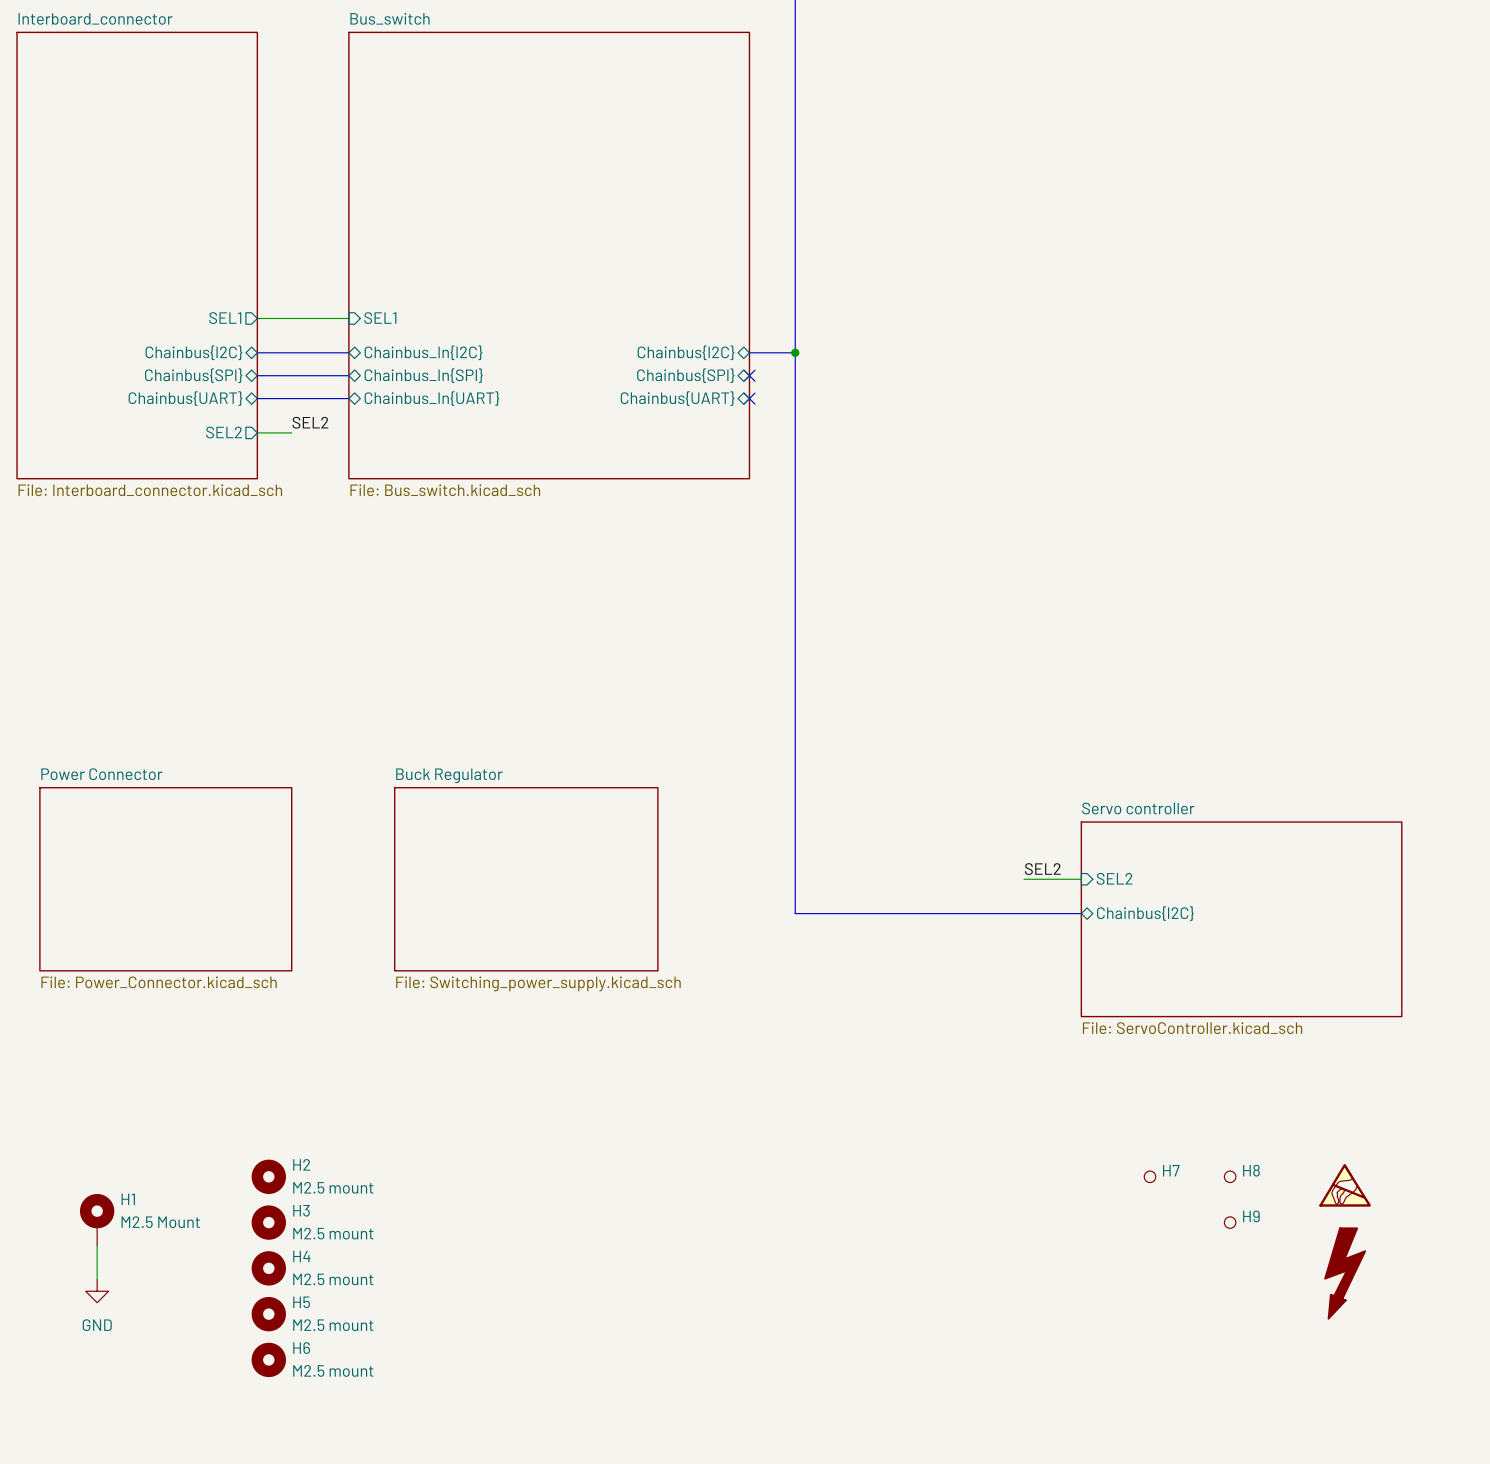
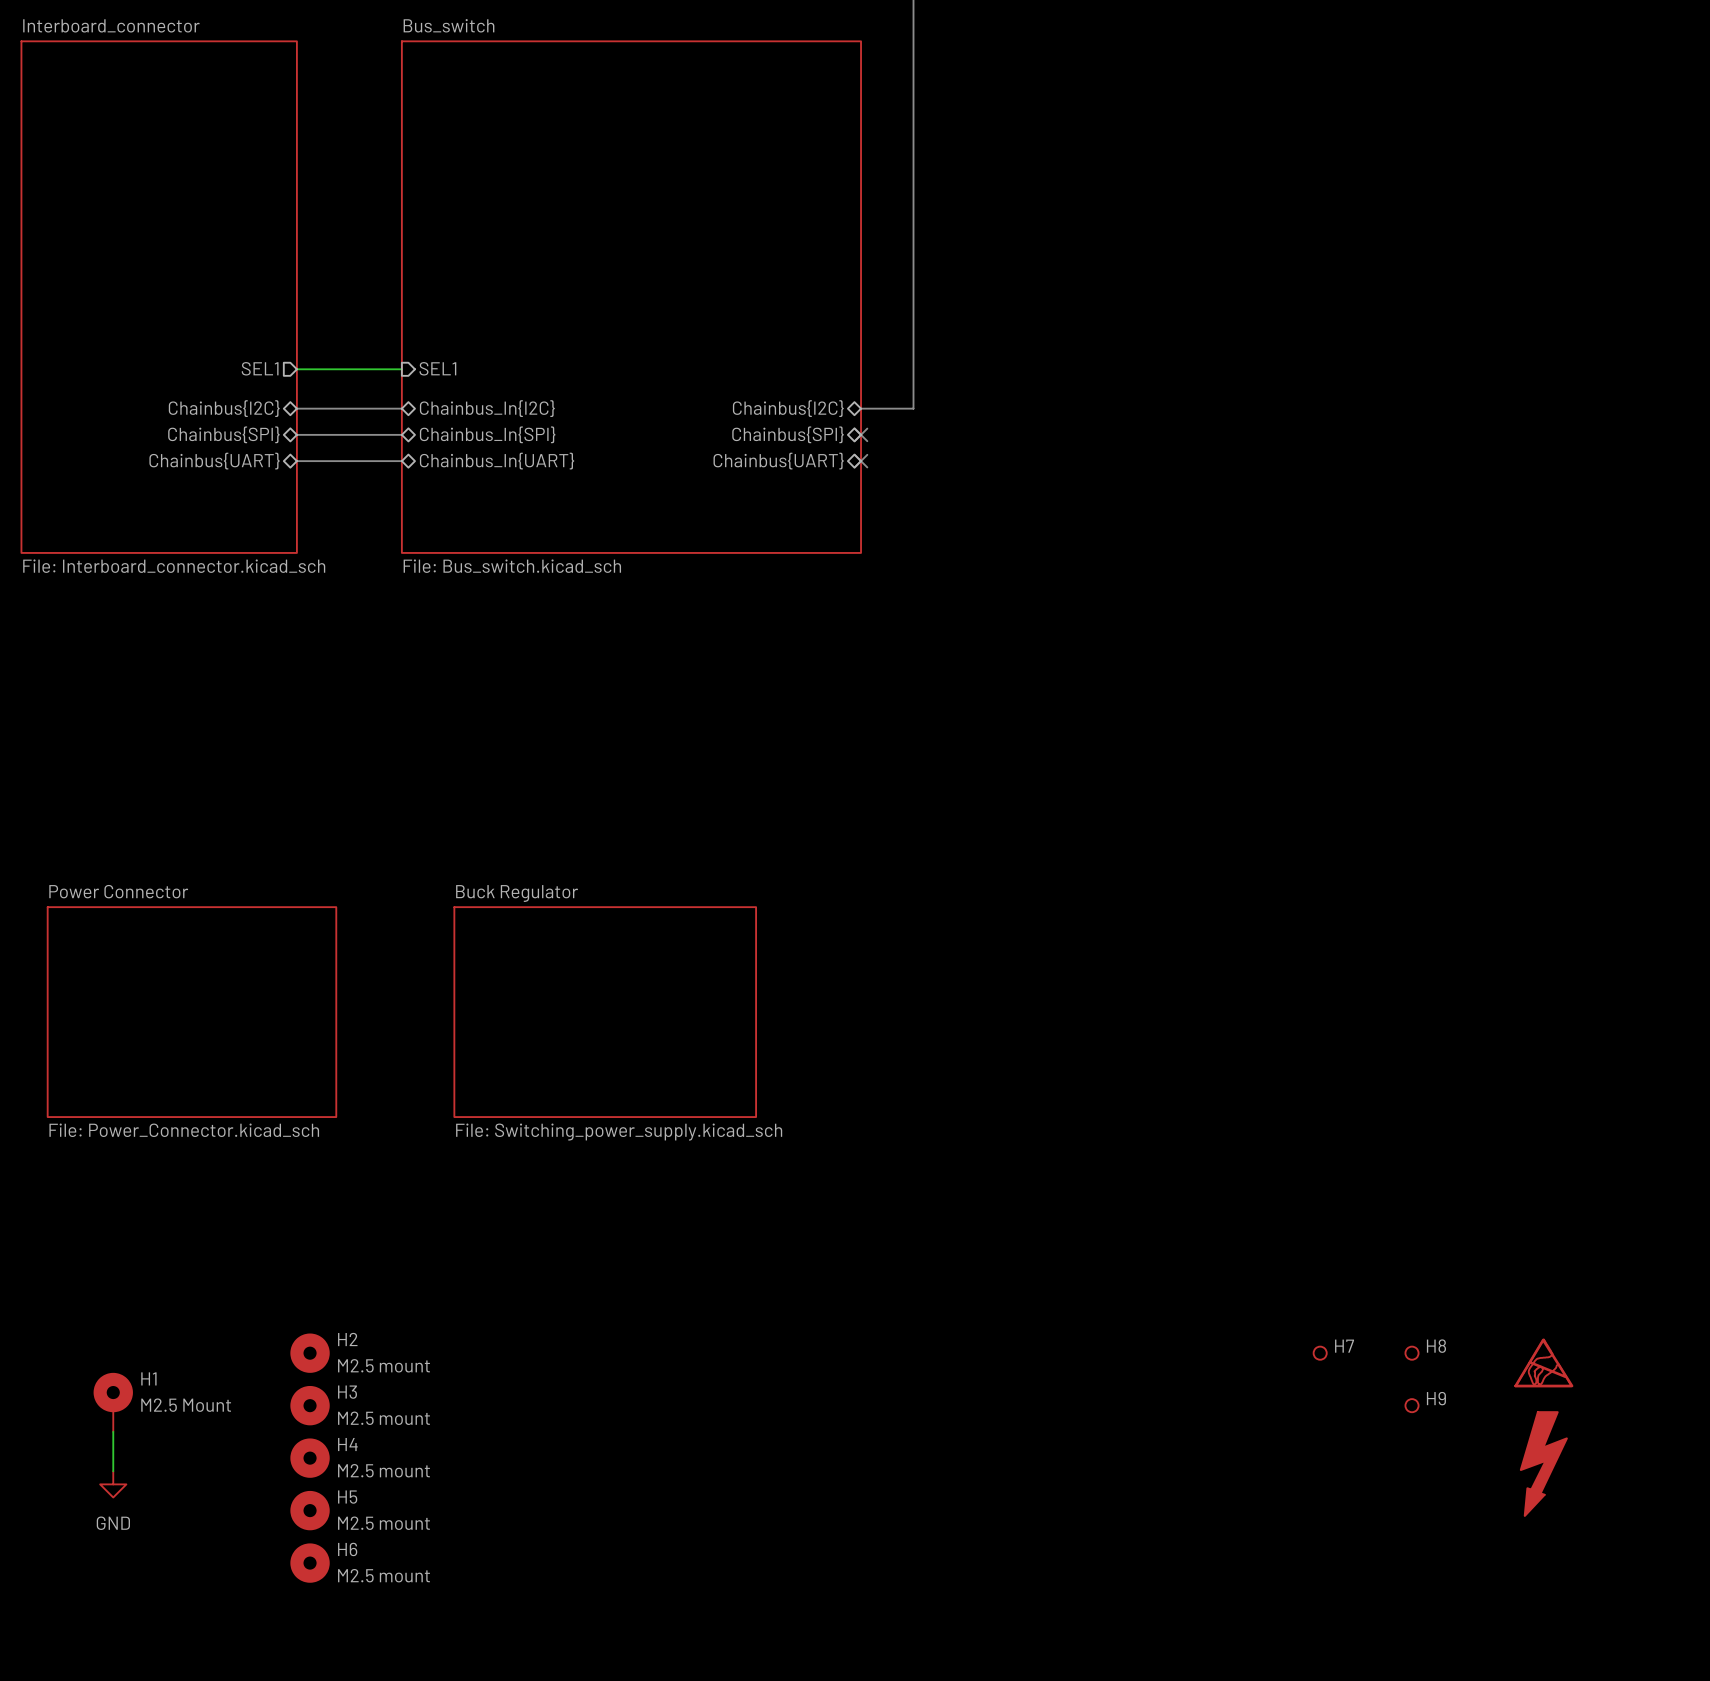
bus: (795, 352) (795, 913) (1081, 913) -> none
junction: (795, 352) -> none
label: SEL2 (310, 422) -> none
sheet pin: SEL2 (224, 432) -> none
wire: (257, 432) (291, 432) -> none
label: SEL2 (1042, 869) -> none
sheet pin: SEL2 (1114, 878) -> none
wire: (1024, 879) (1081, 879) -> none
sheet pin: Chainbus{I2C} (1145, 913) -> none
sheet Servo controller: File: ServoController.kicad_sch (1241, 919) -> none

